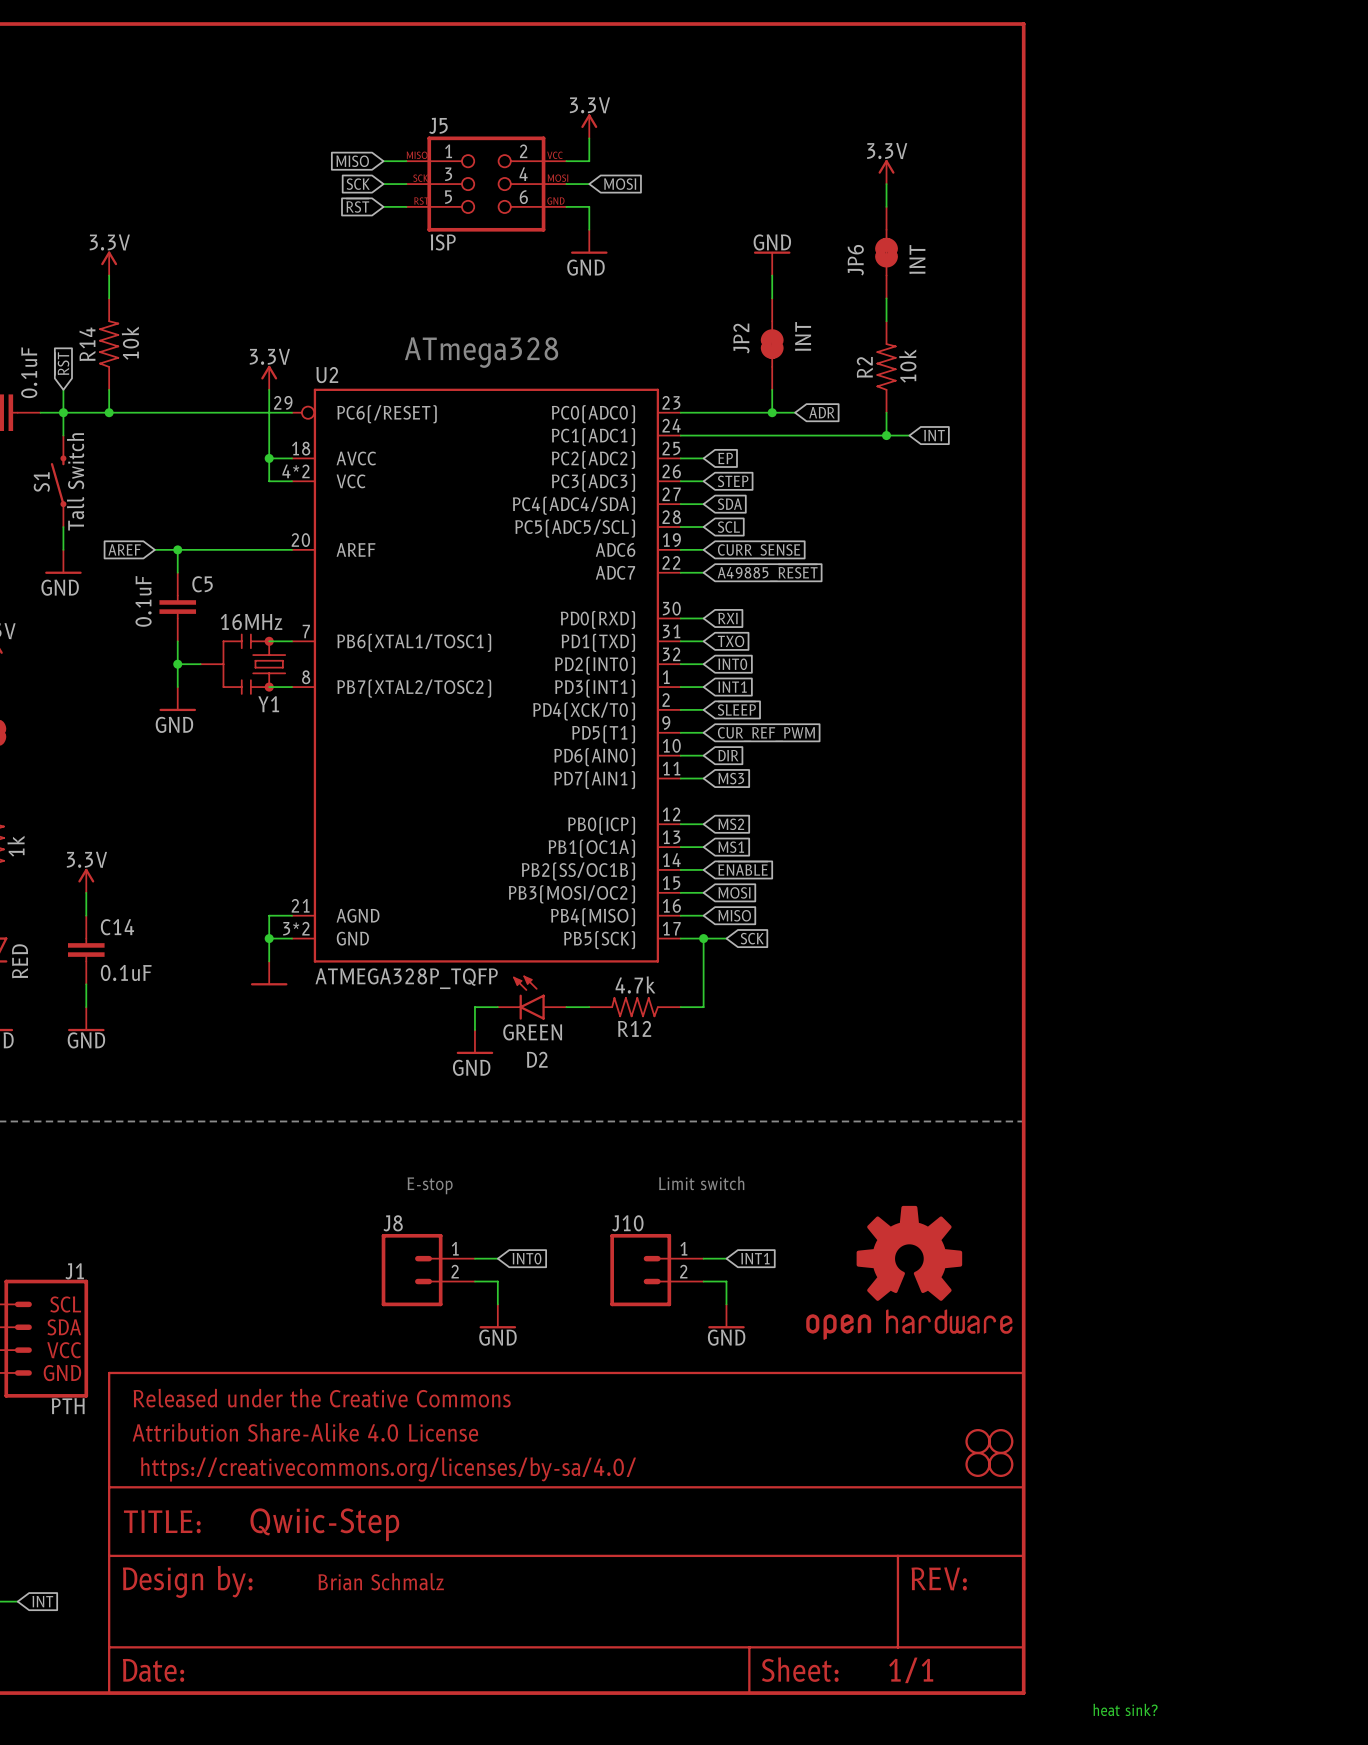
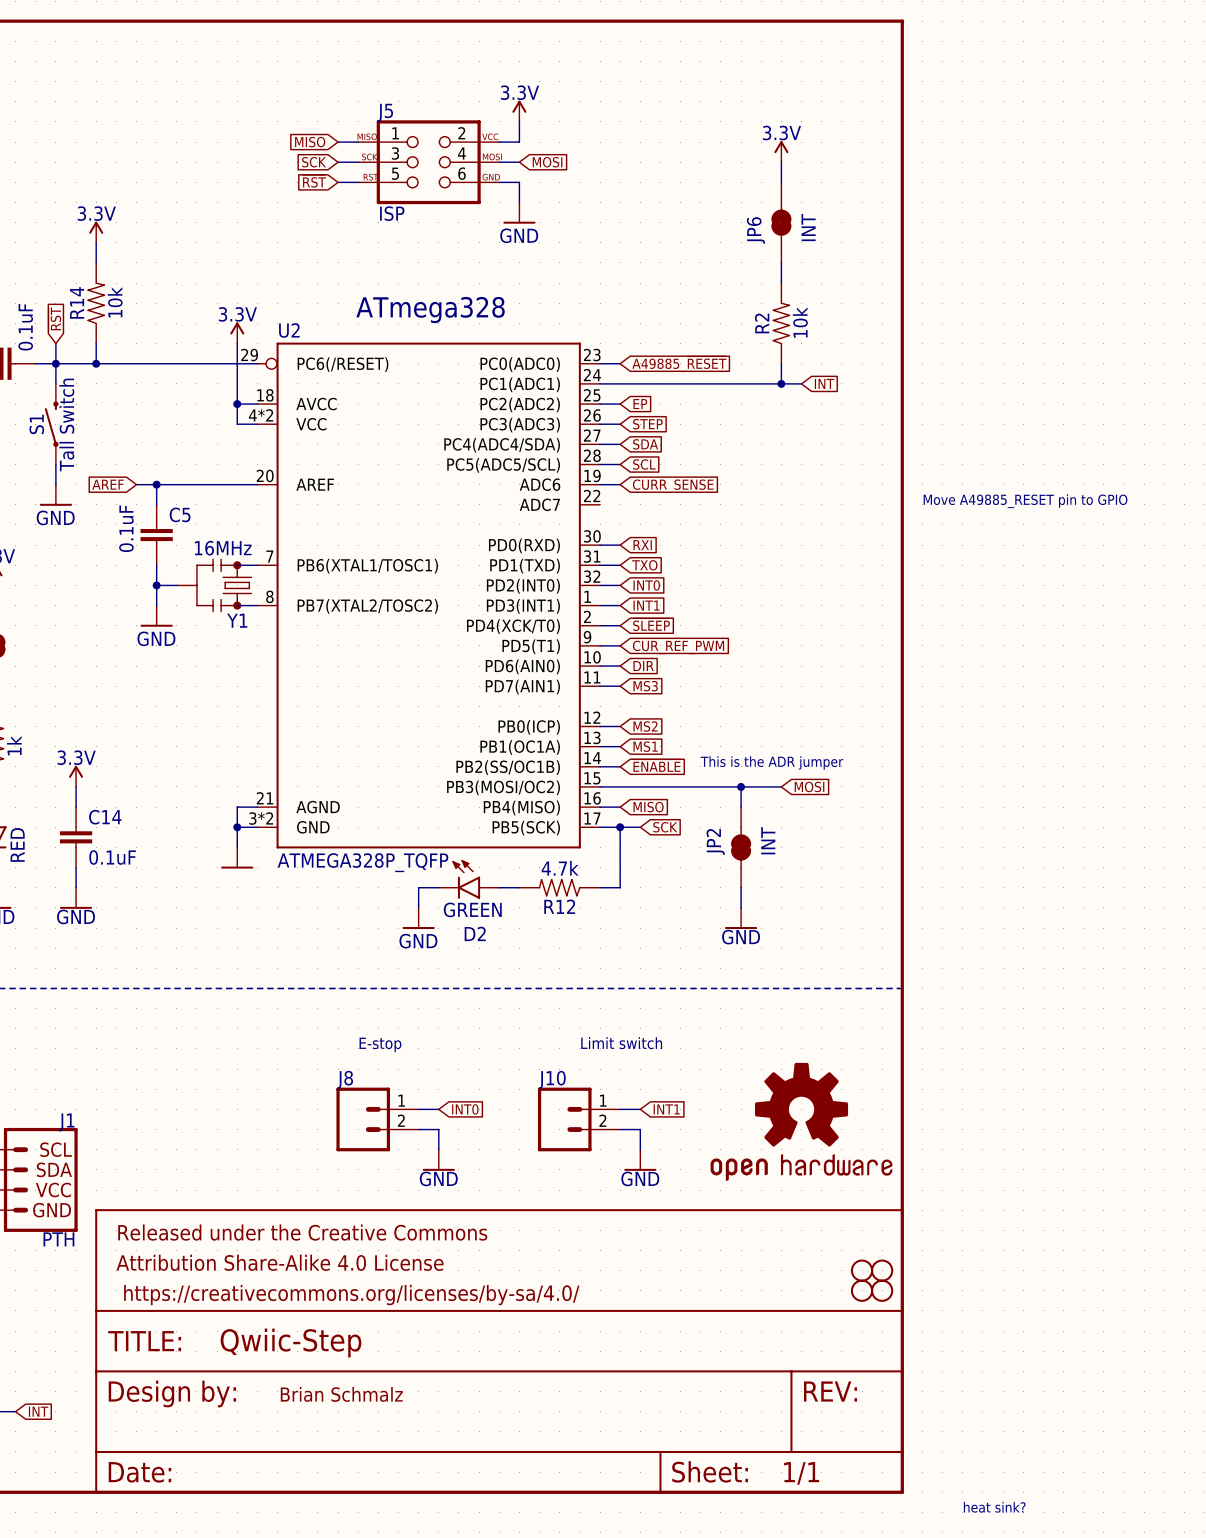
power symbol: GND (772, 263) -> none
wire: (772, 275) (772, 298) -> none
JP2 position: (772, 344) -> (741, 847)
wire: (772, 389) (772, 412) -> none
wire: (703, 412) (795, 412) -> none
junction: (772, 412) -> none
global label: ADR (821, 412) -> none
text: none -> Move A49885_RESET pin to GPIO (1025, 501)
wire: (680, 572) (703, 572) -> none
global label position: A49885_~{RESET} (767, 573) -> A49885_~{RESET} (679, 364)
text: none -> This is the ADR jumper (771, 762)
wire: none -> (620, 786) (781, 786)
global label position: MOSI (734, 892) -> MOSI (809, 786)
wire: none -> (741, 786) (741, 807)
junction: none -> (741, 786)
wire: none -> (741, 887) (741, 907)
power symbol: none -> GND (741, 918)

